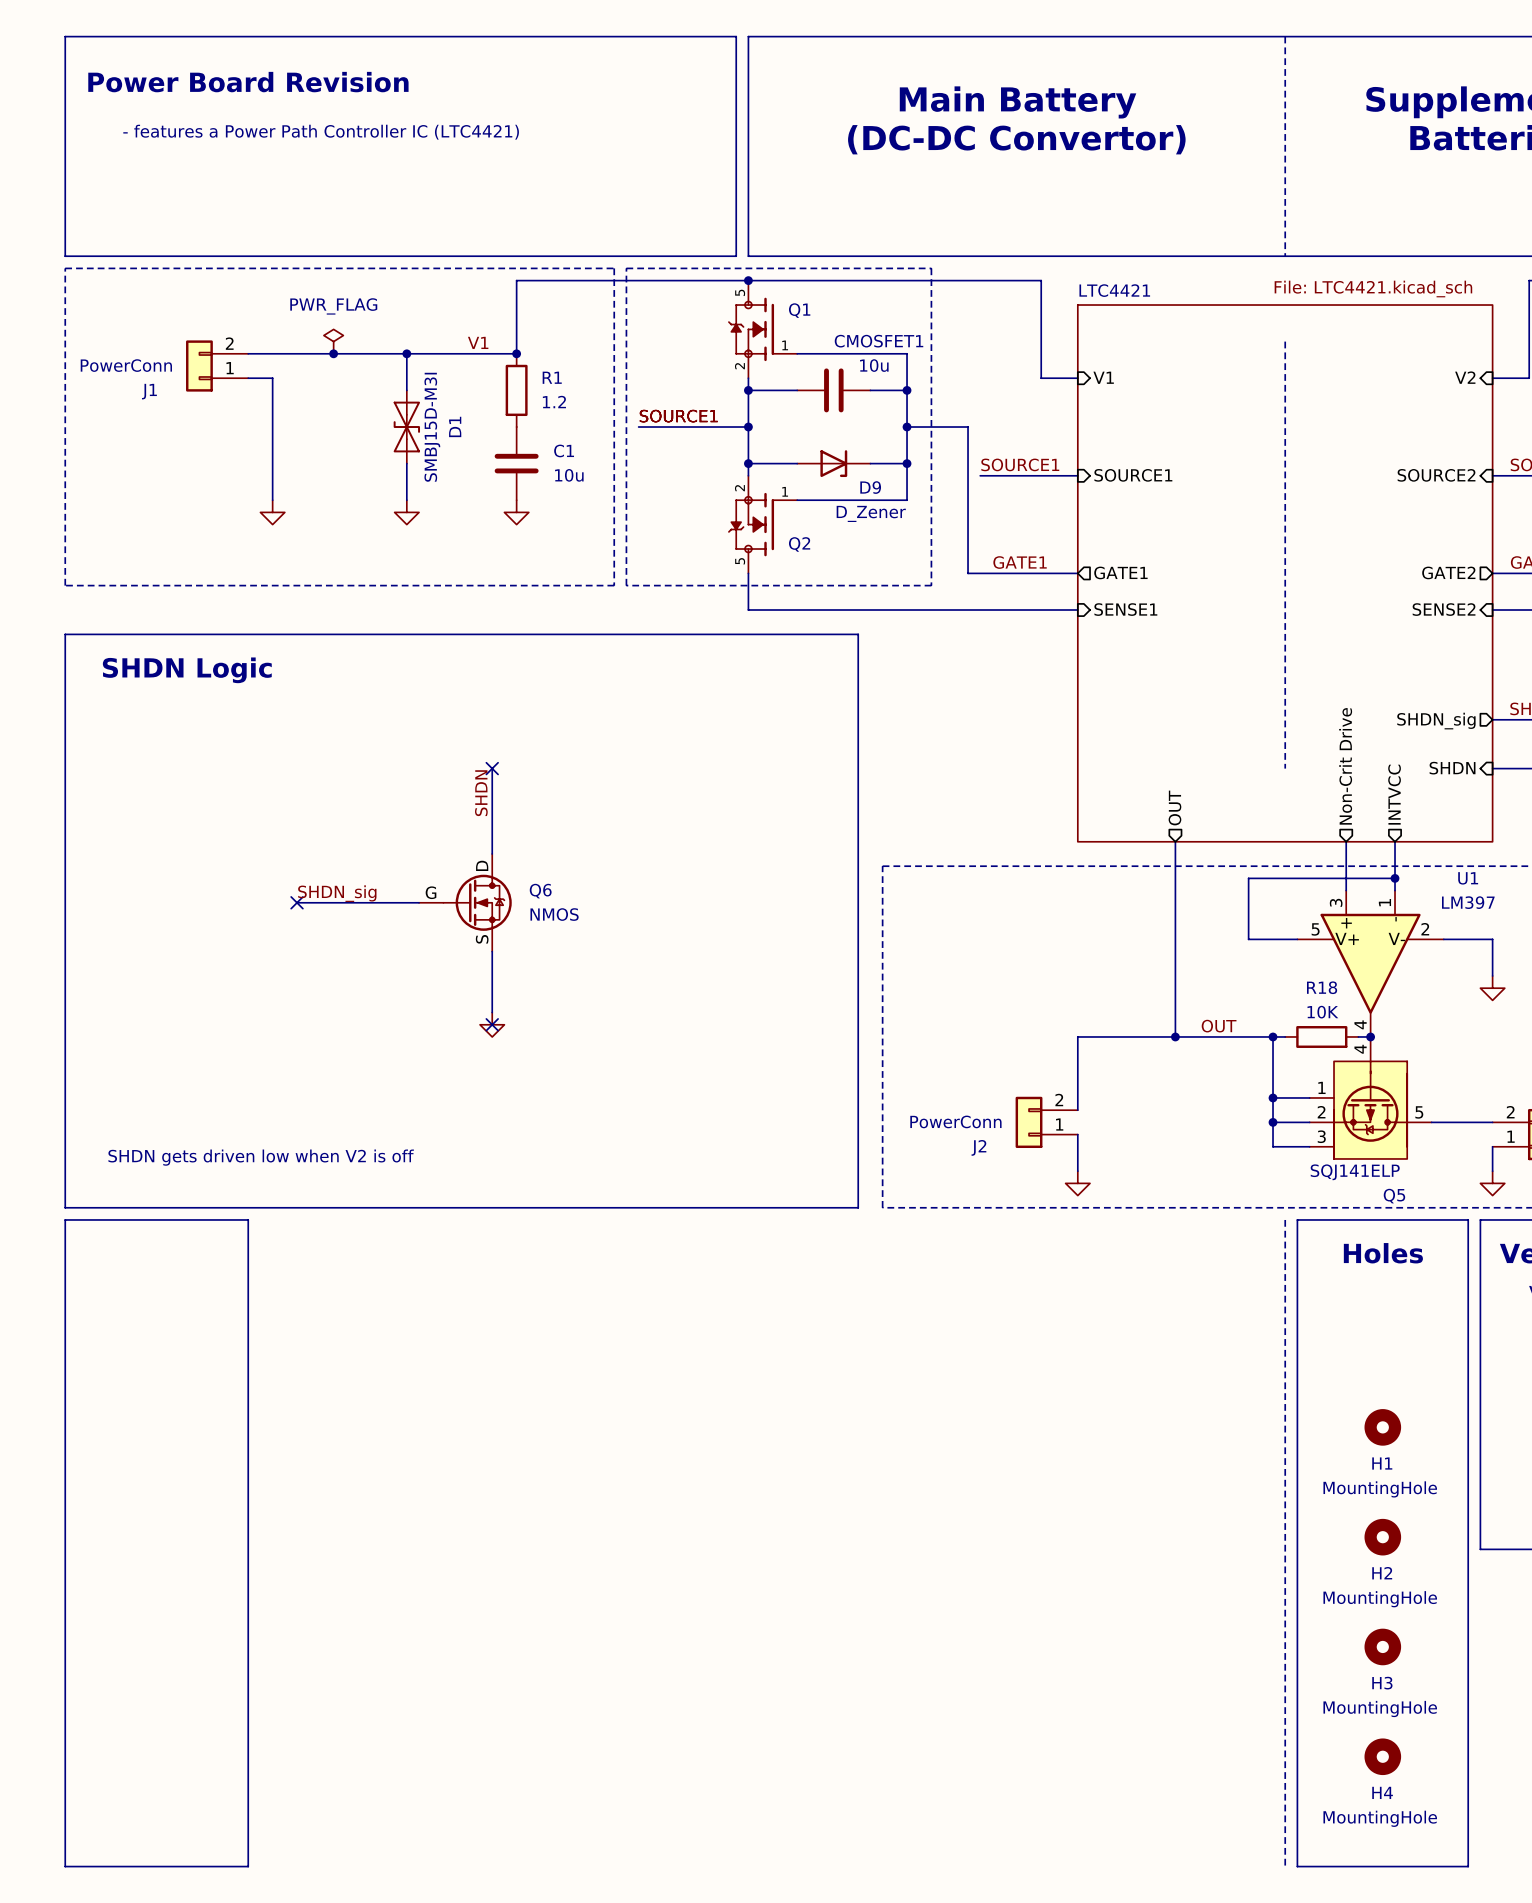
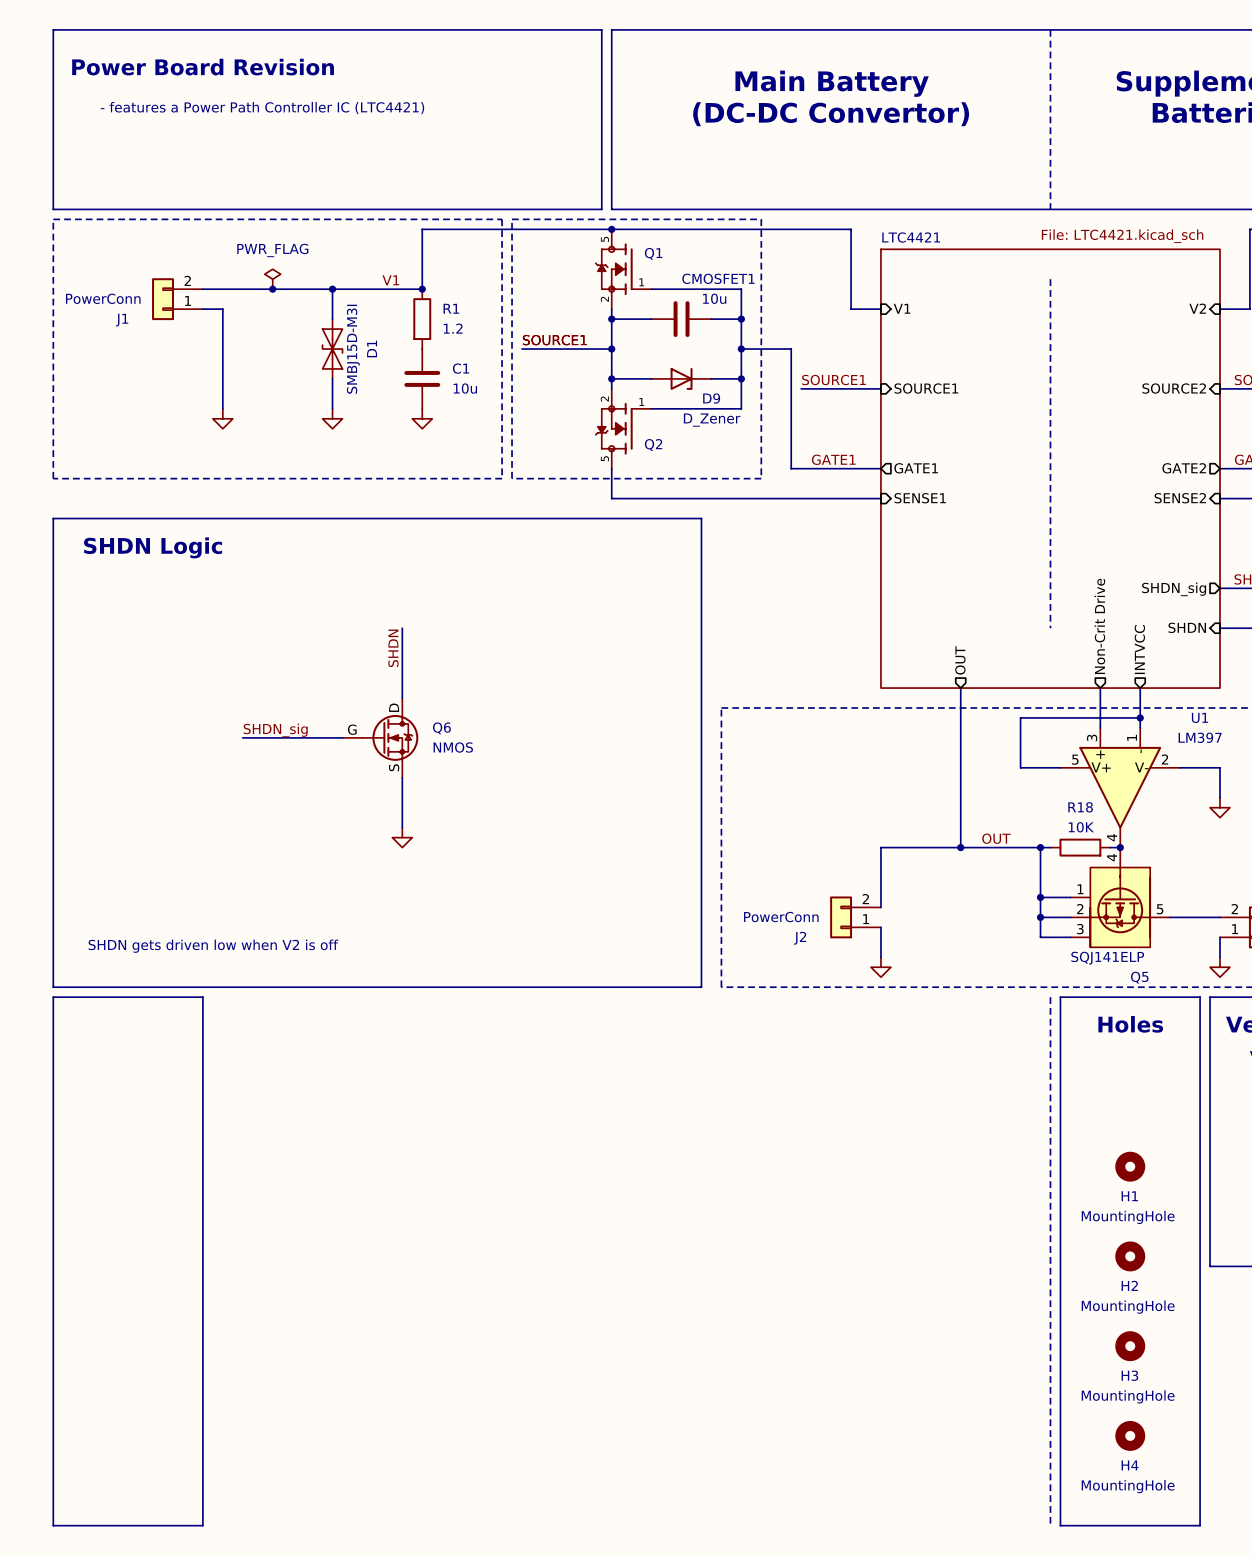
no-connect mark: (492, 768) -> none
no-connect mark: (297, 902) -> none
no-connect mark: (492, 1024) -> none

